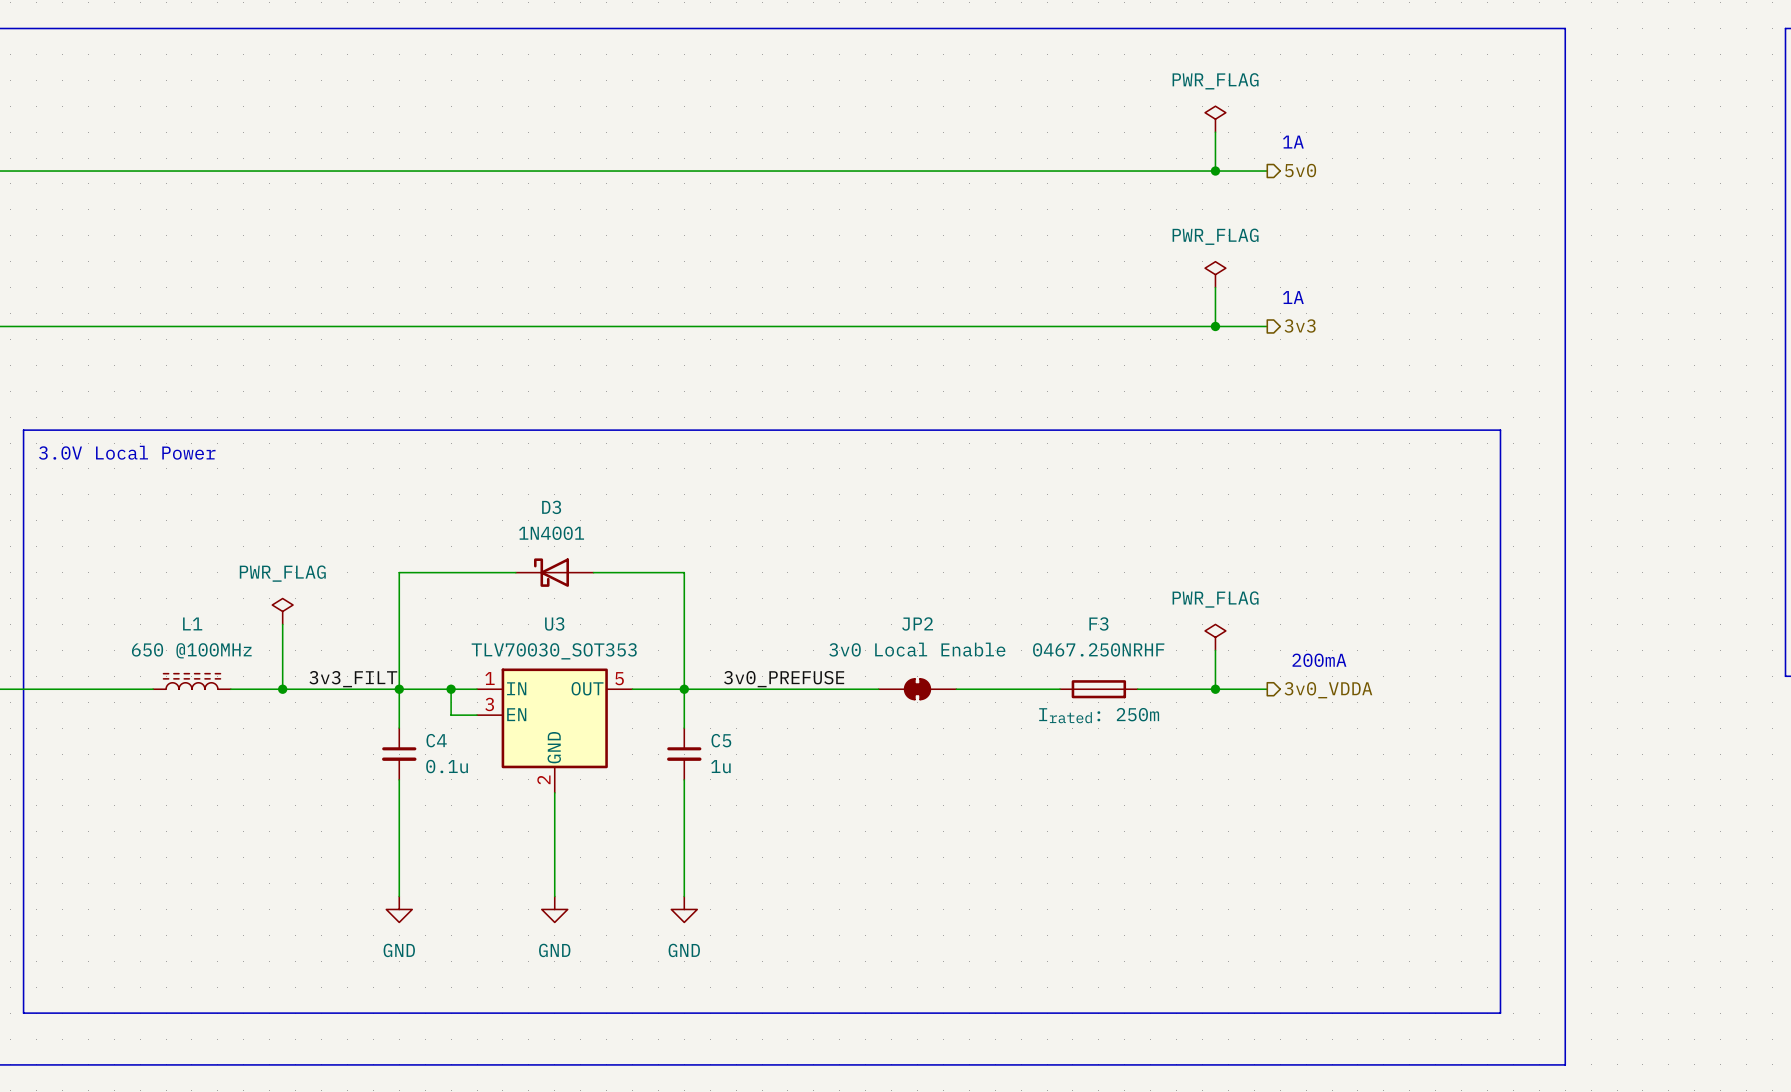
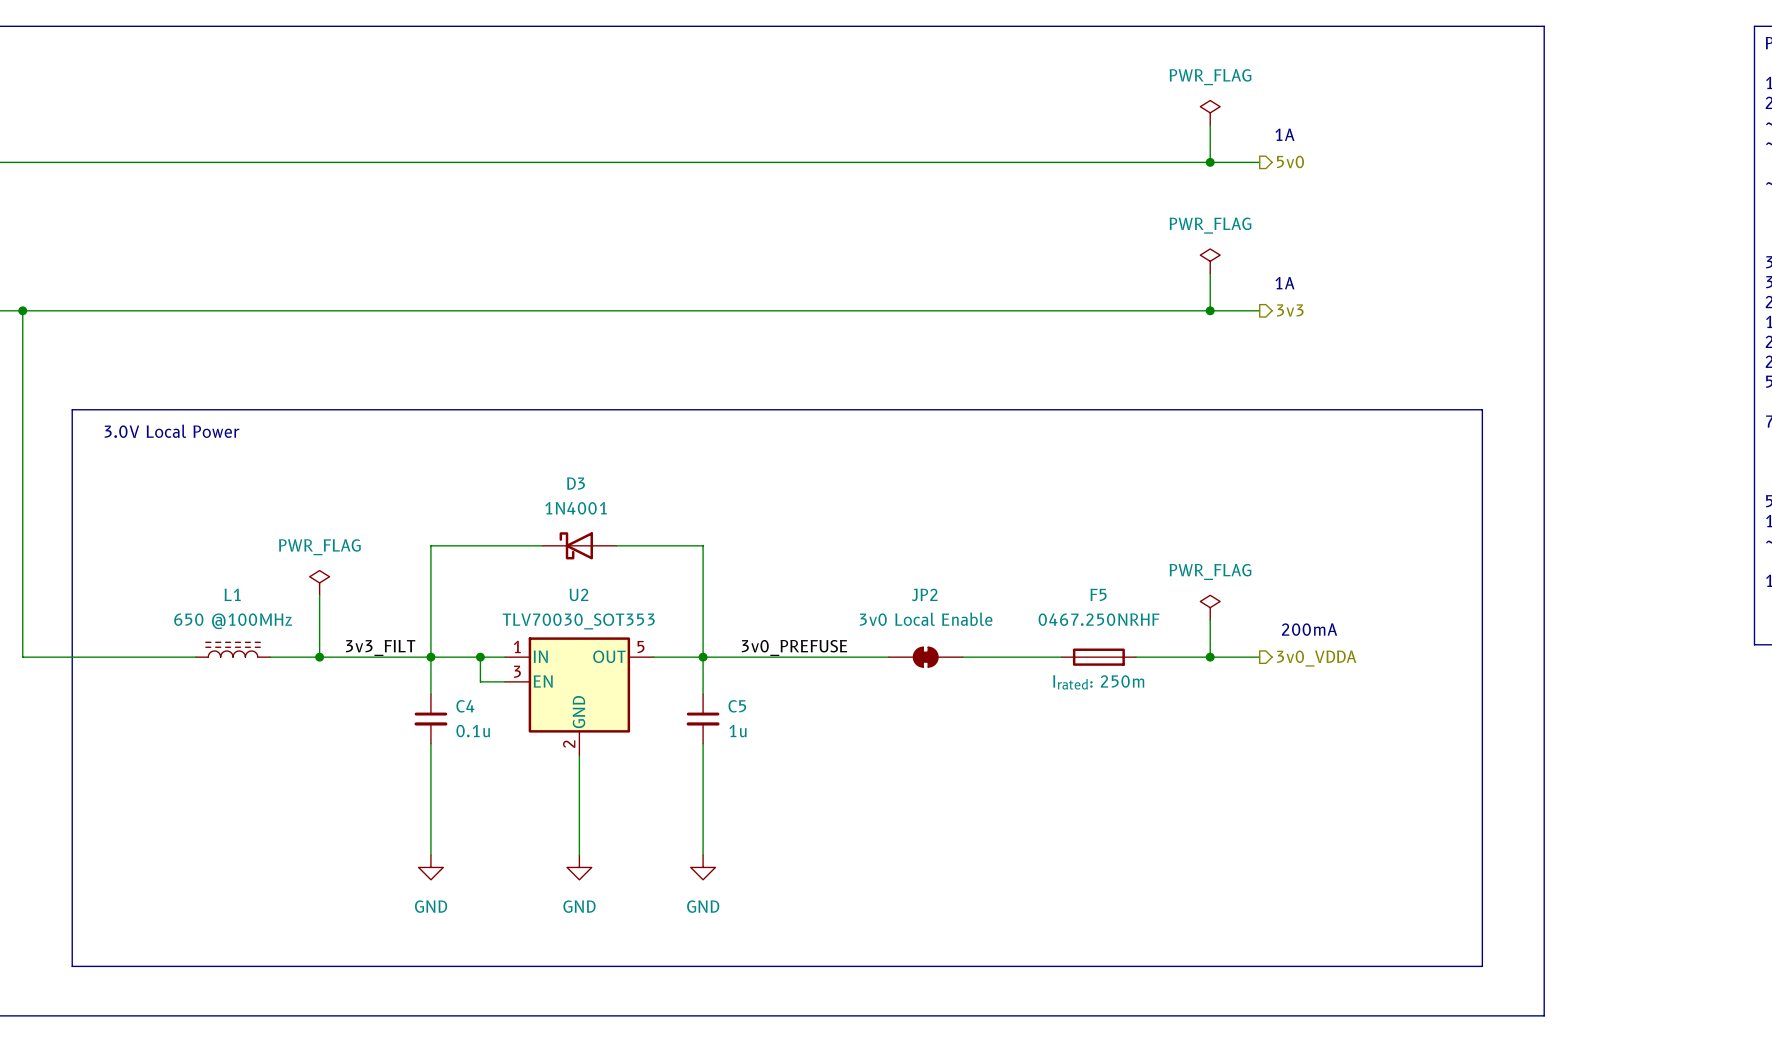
U3 name: U3 (554, 623) -> U2 (579, 594)
F3 name: F3 (1098, 623) -> F5 (1098, 594)

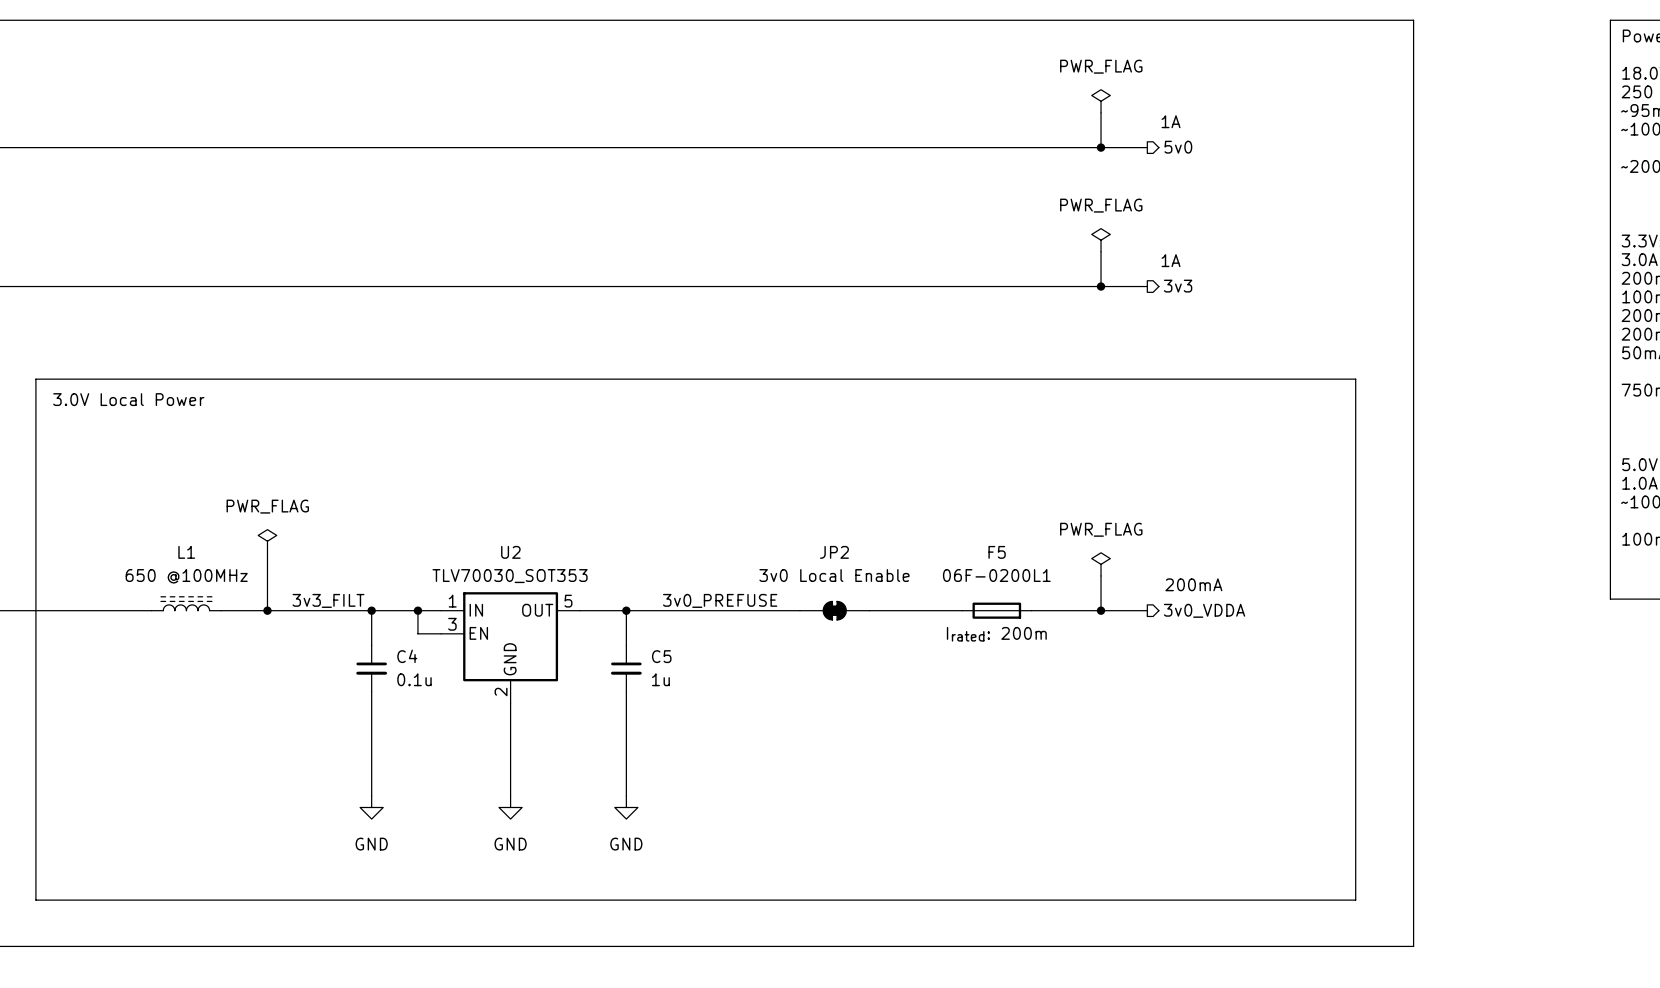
wire: (542, 545) (430, 545) (430, 657) -> none
D3: 1N4001 (579, 545) -> none
wire: (616, 545) (703, 545) (703, 657) -> none
F5 value: 0467.250NRHF (1099, 619) -> 06F-0200L1 (996, 575)
F5 text: Irated: 250m (1098, 682) -> Irated: 200m (996, 634)

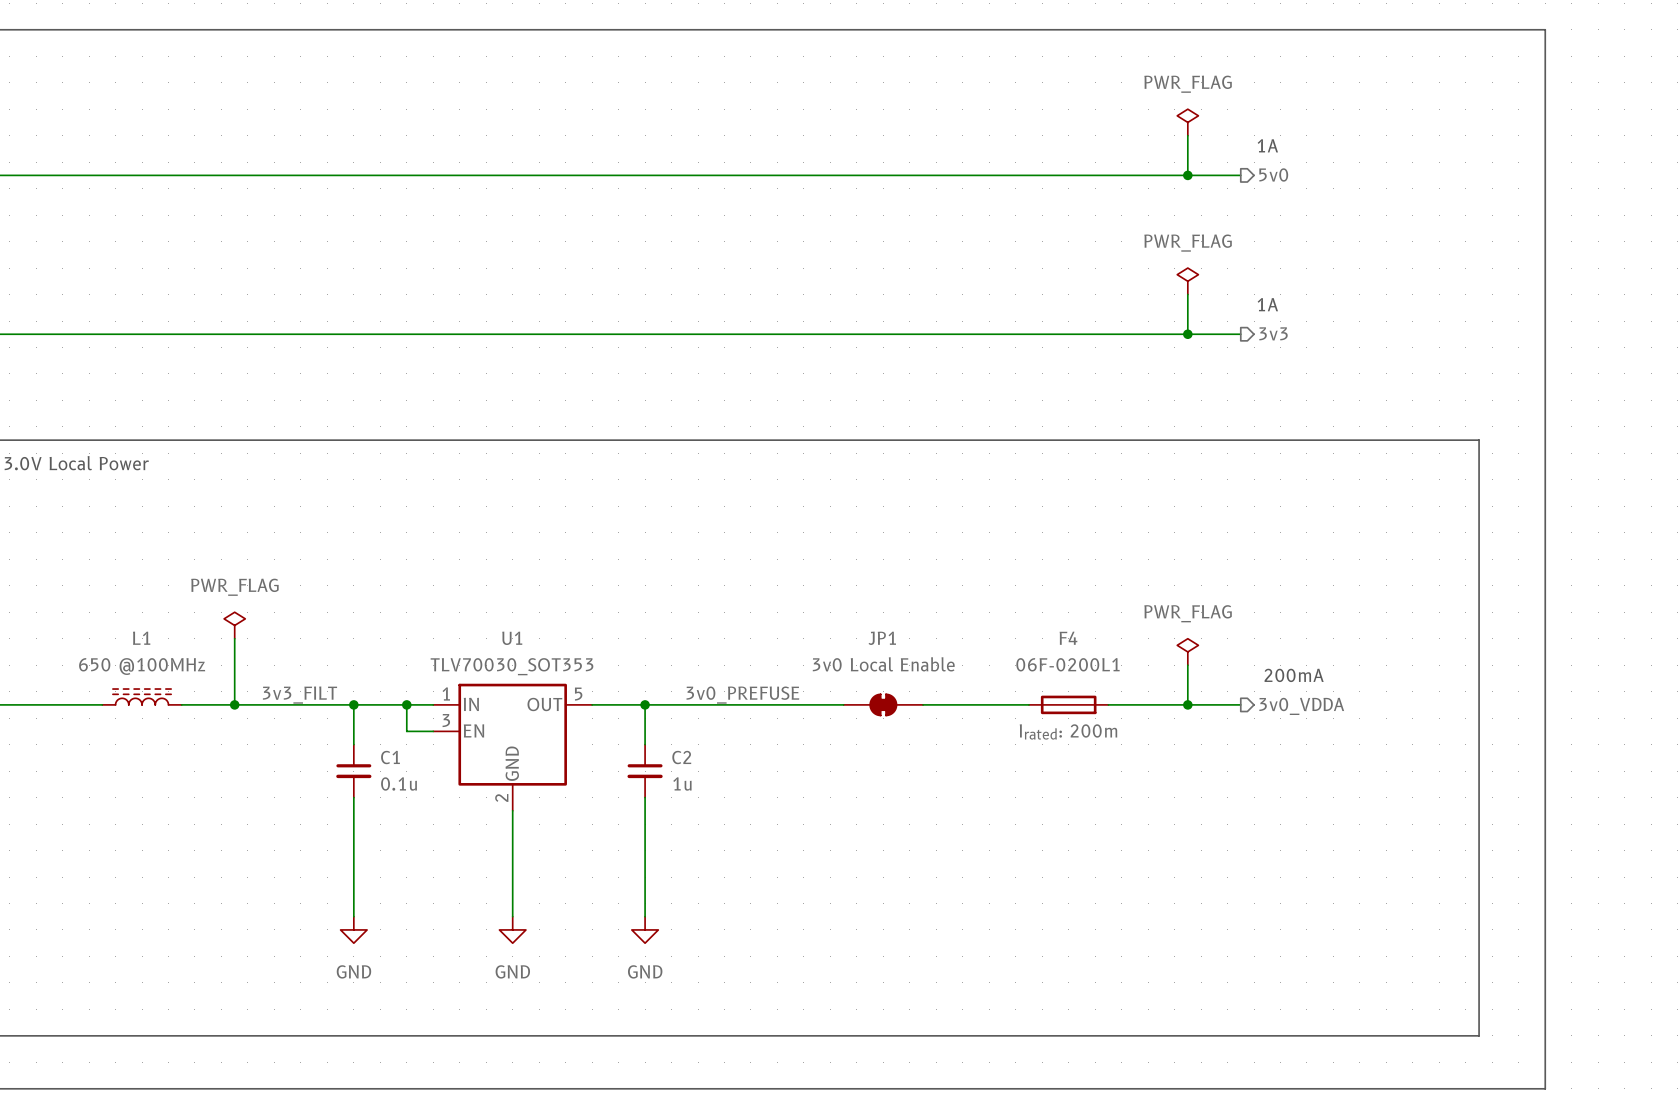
U2 name: U2 (510, 552) -> U1 (512, 638)
JP2 name: JP2 (834, 552) -> JP1 (882, 638)
F5 name: F5 (997, 552) -> F4 (1068, 638)
C4 name: C4 (407, 656) -> C1 (390, 757)
C5 name: C5 (661, 656) -> C2 (681, 757)

